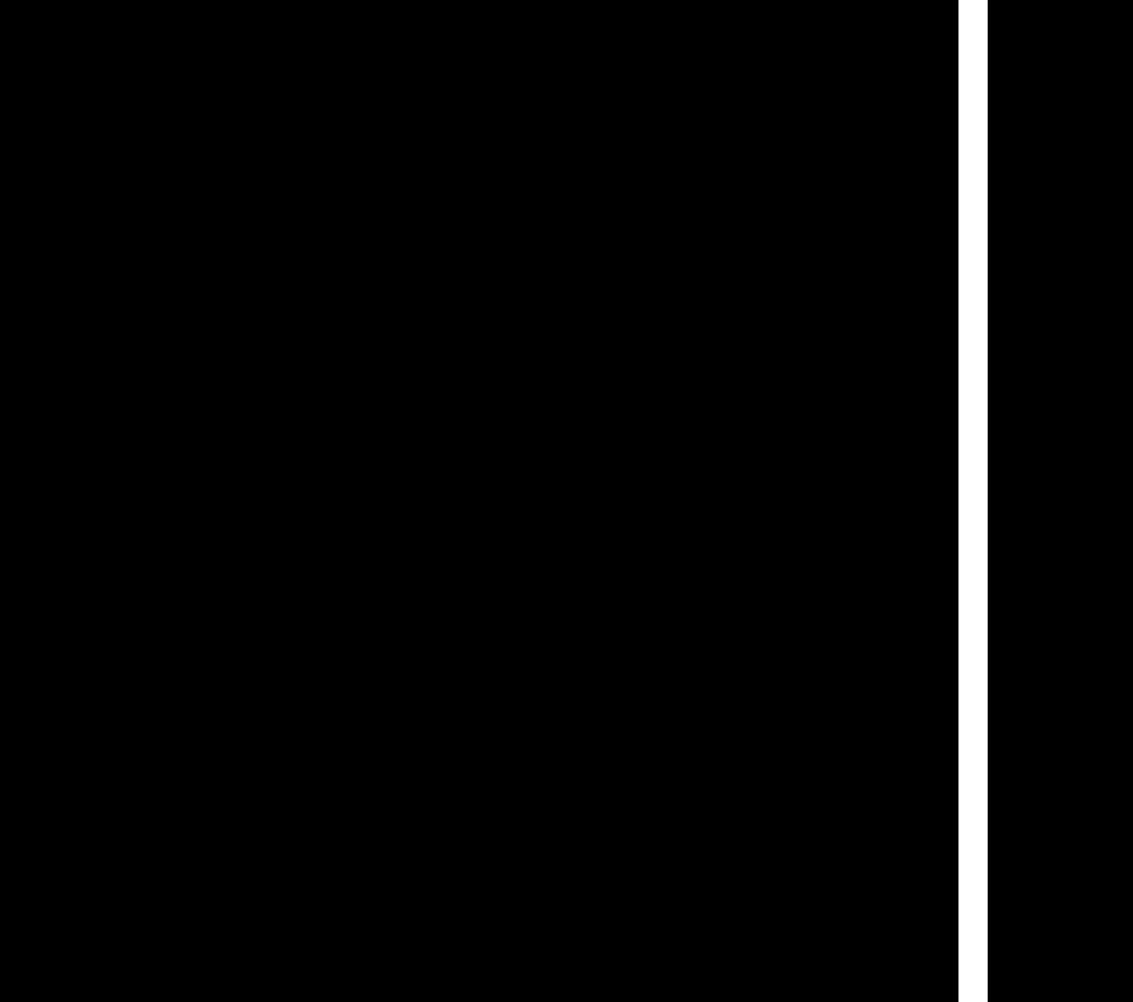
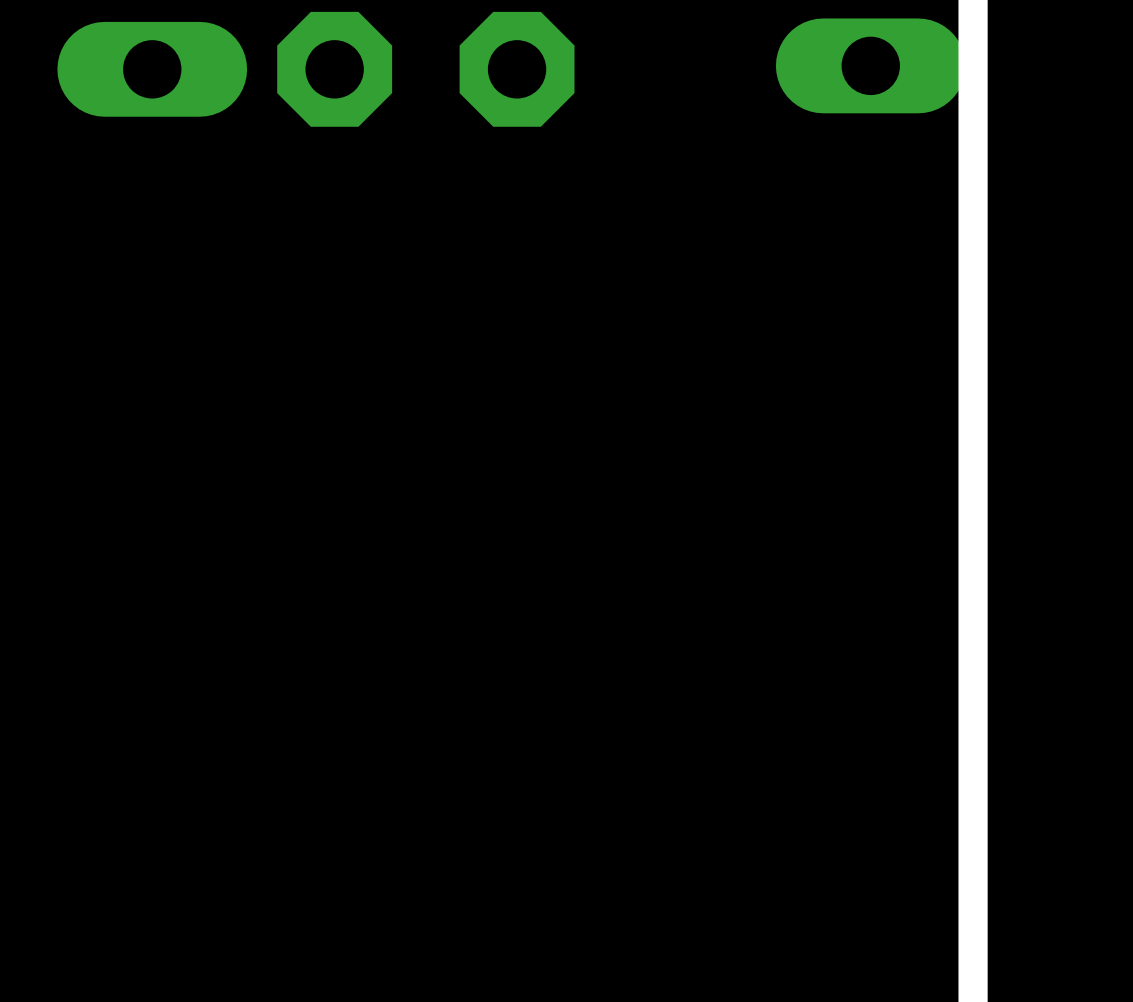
part: none -> (870, 65)
part: none -> (152, 69)
part: none -> (334, 69)
part: none -> (517, 69)

